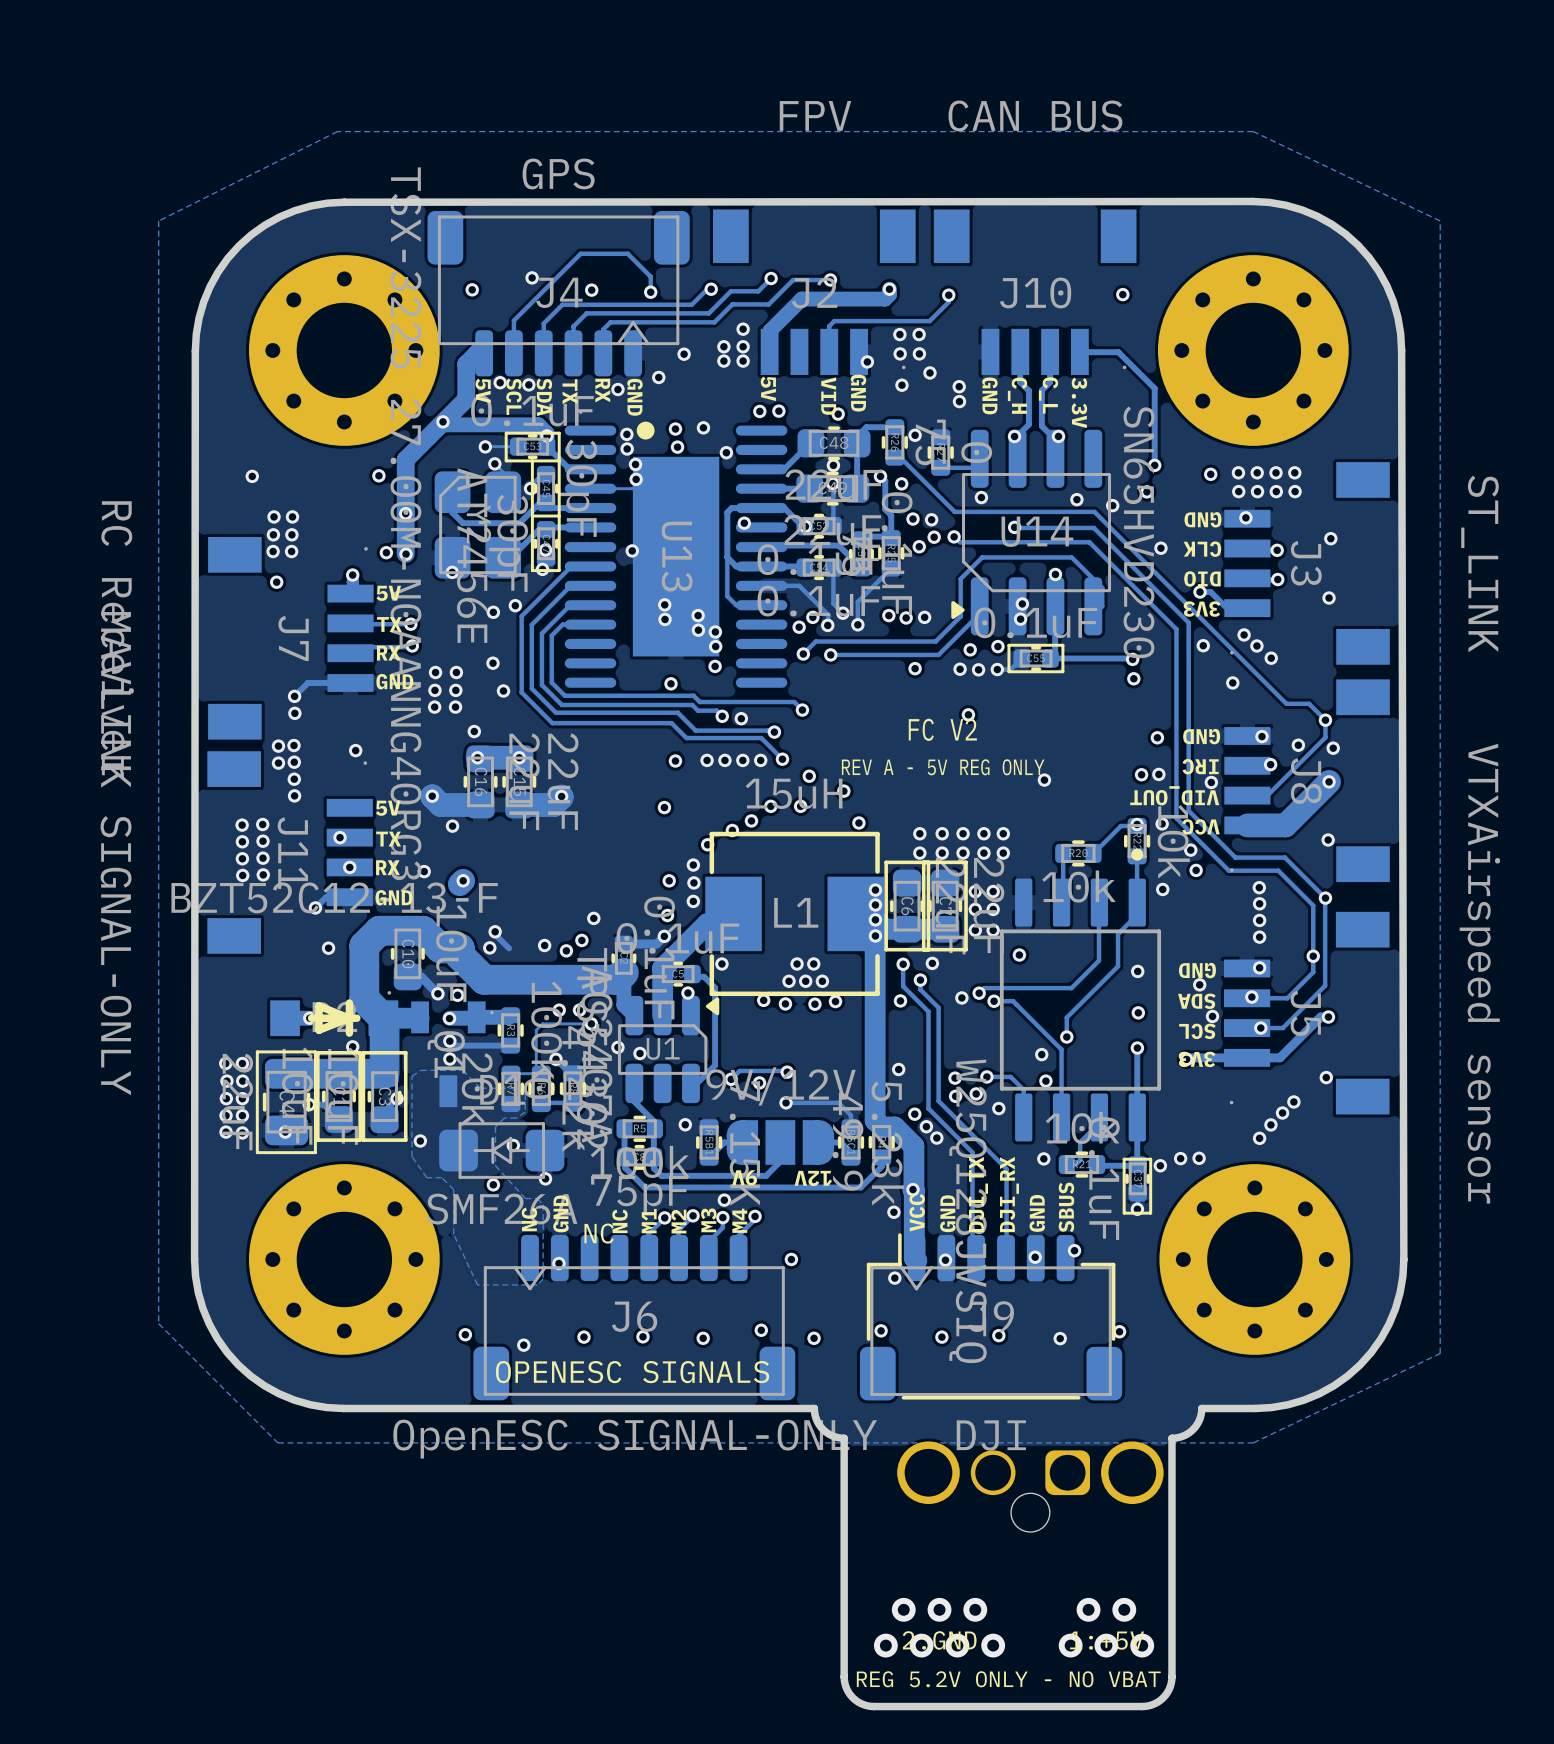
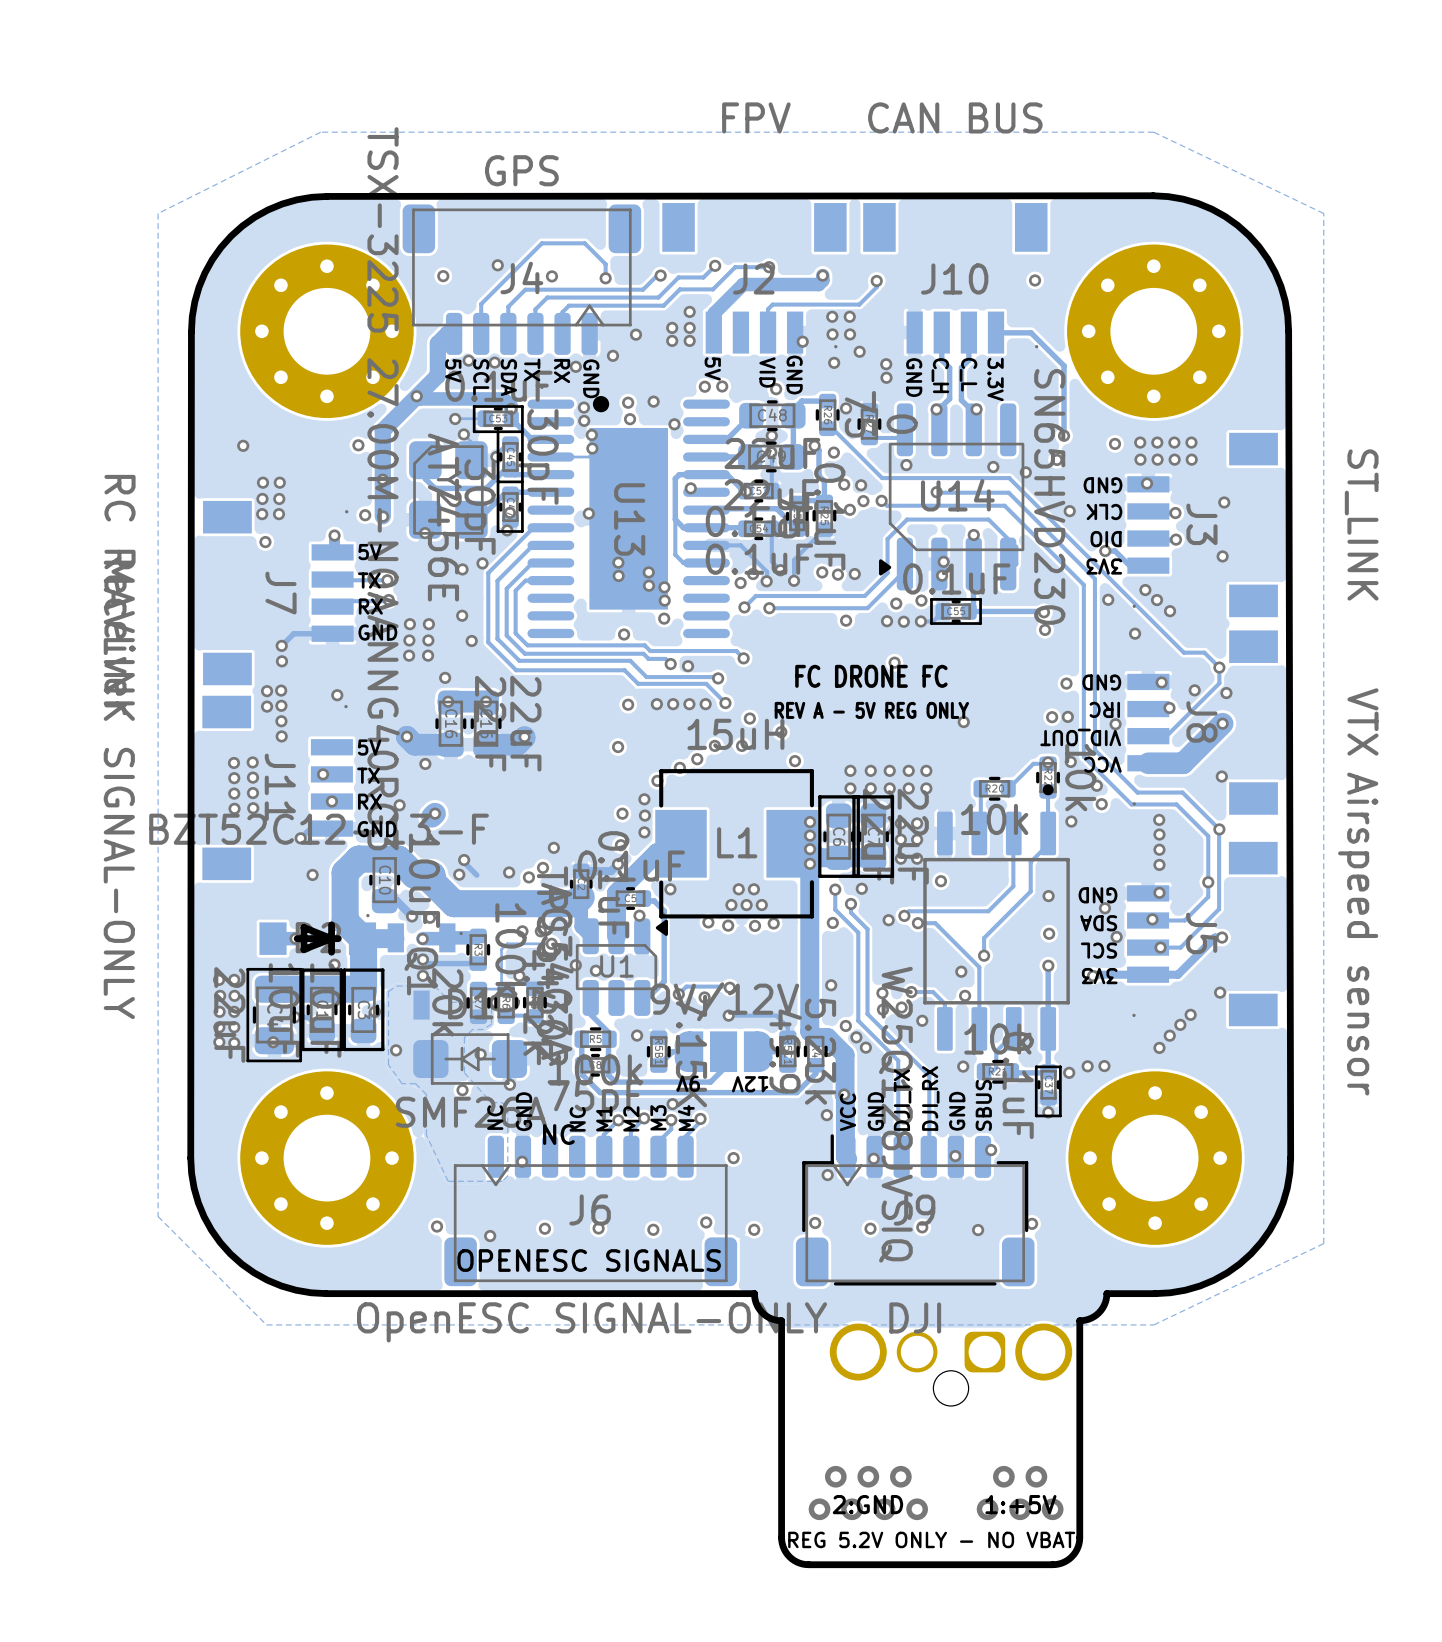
text: FC V2 (942, 729) -> FC DRONE FC (871, 676)

